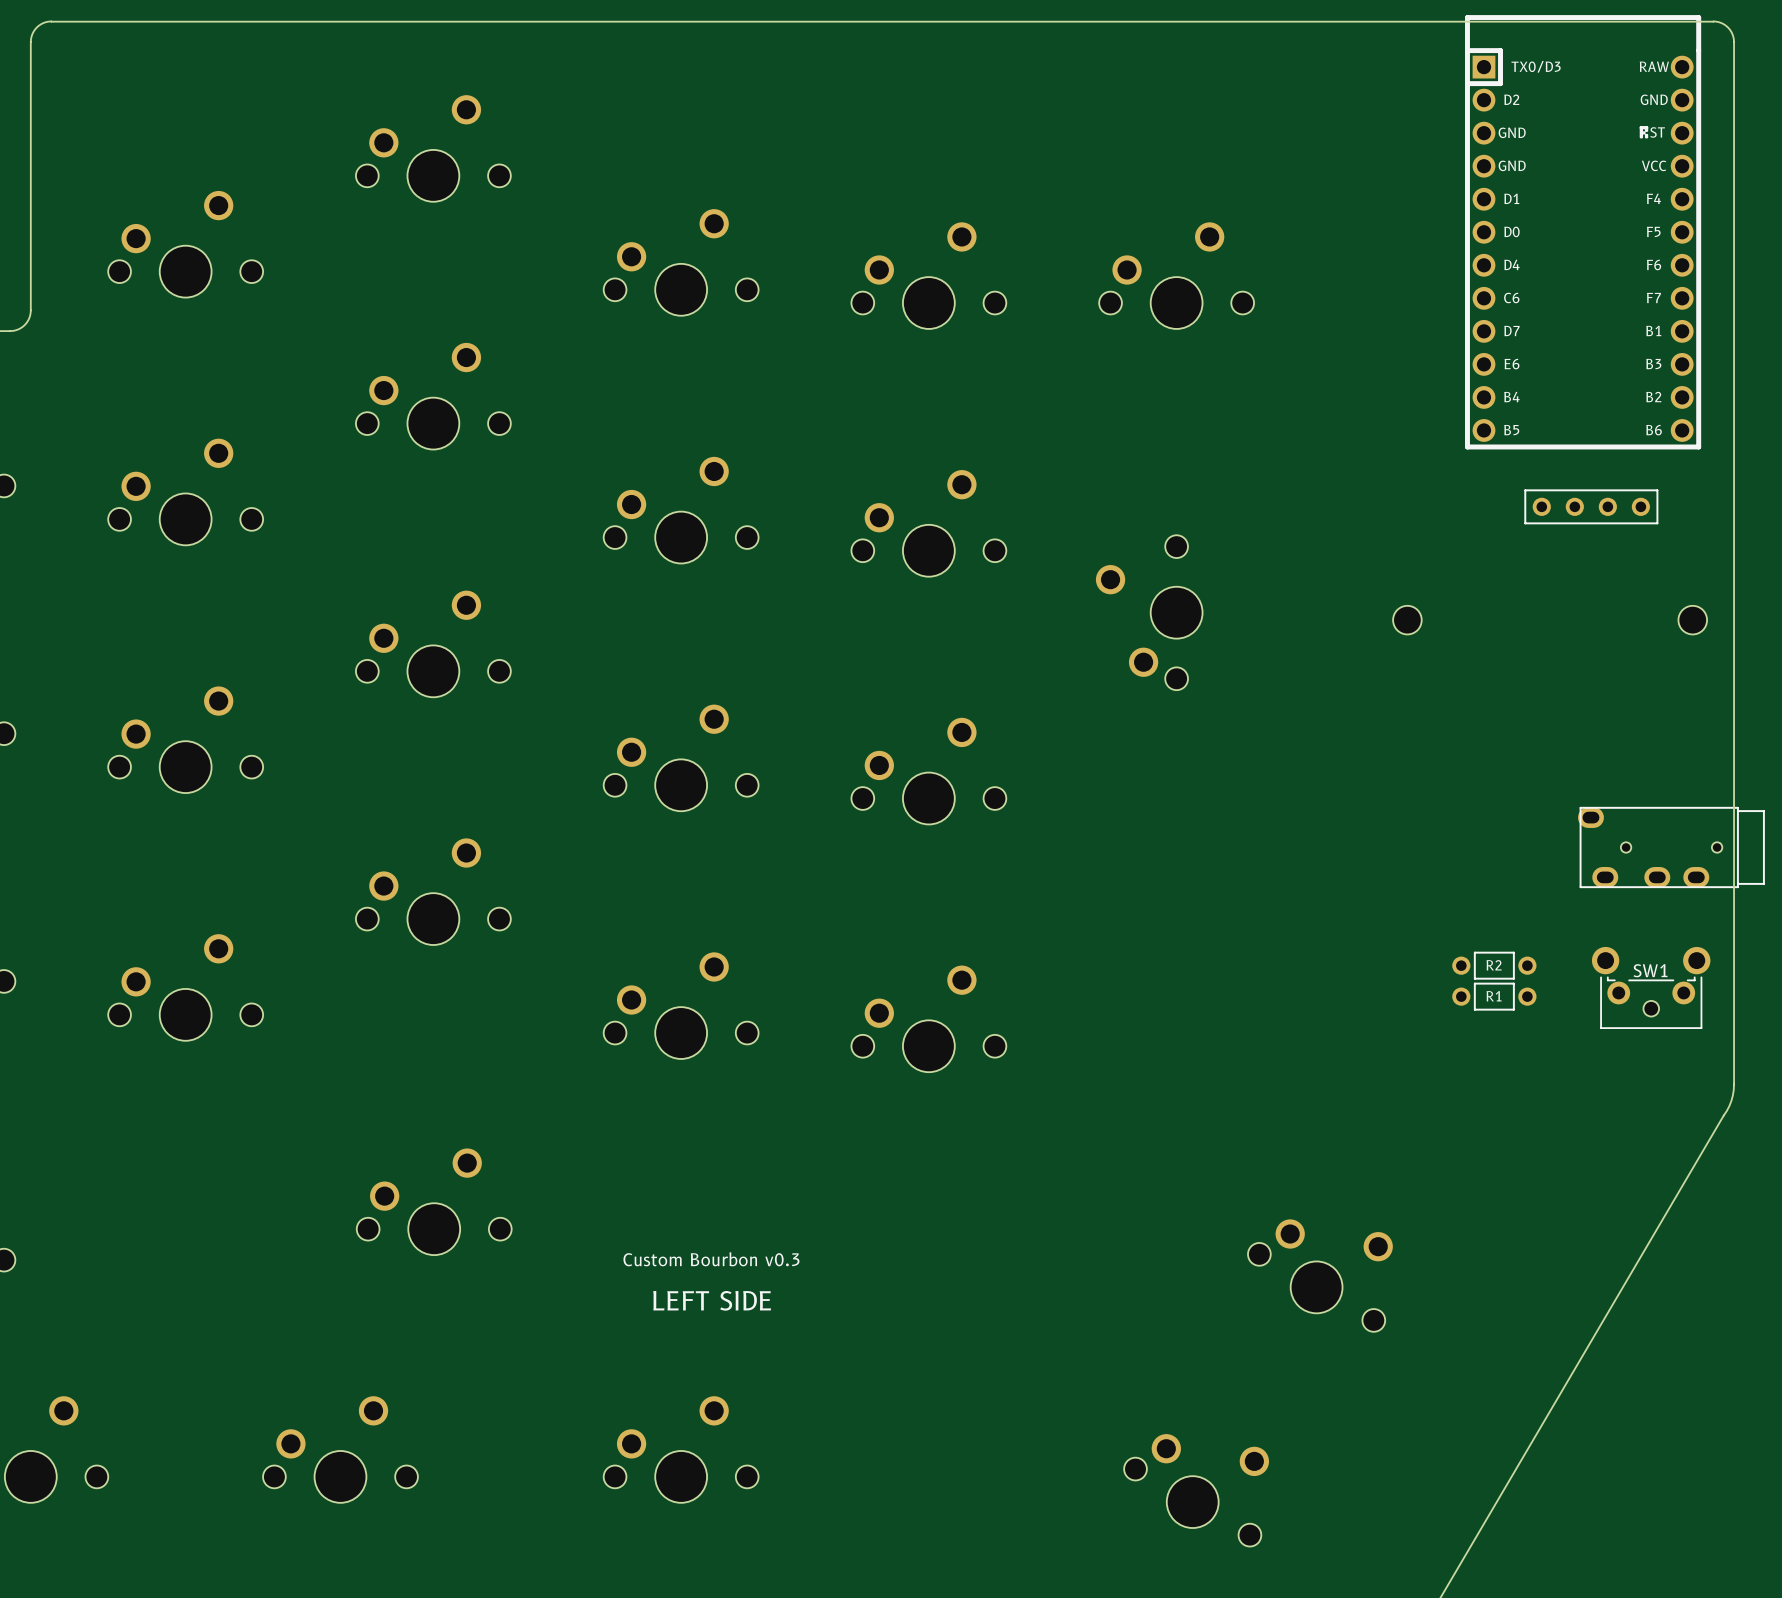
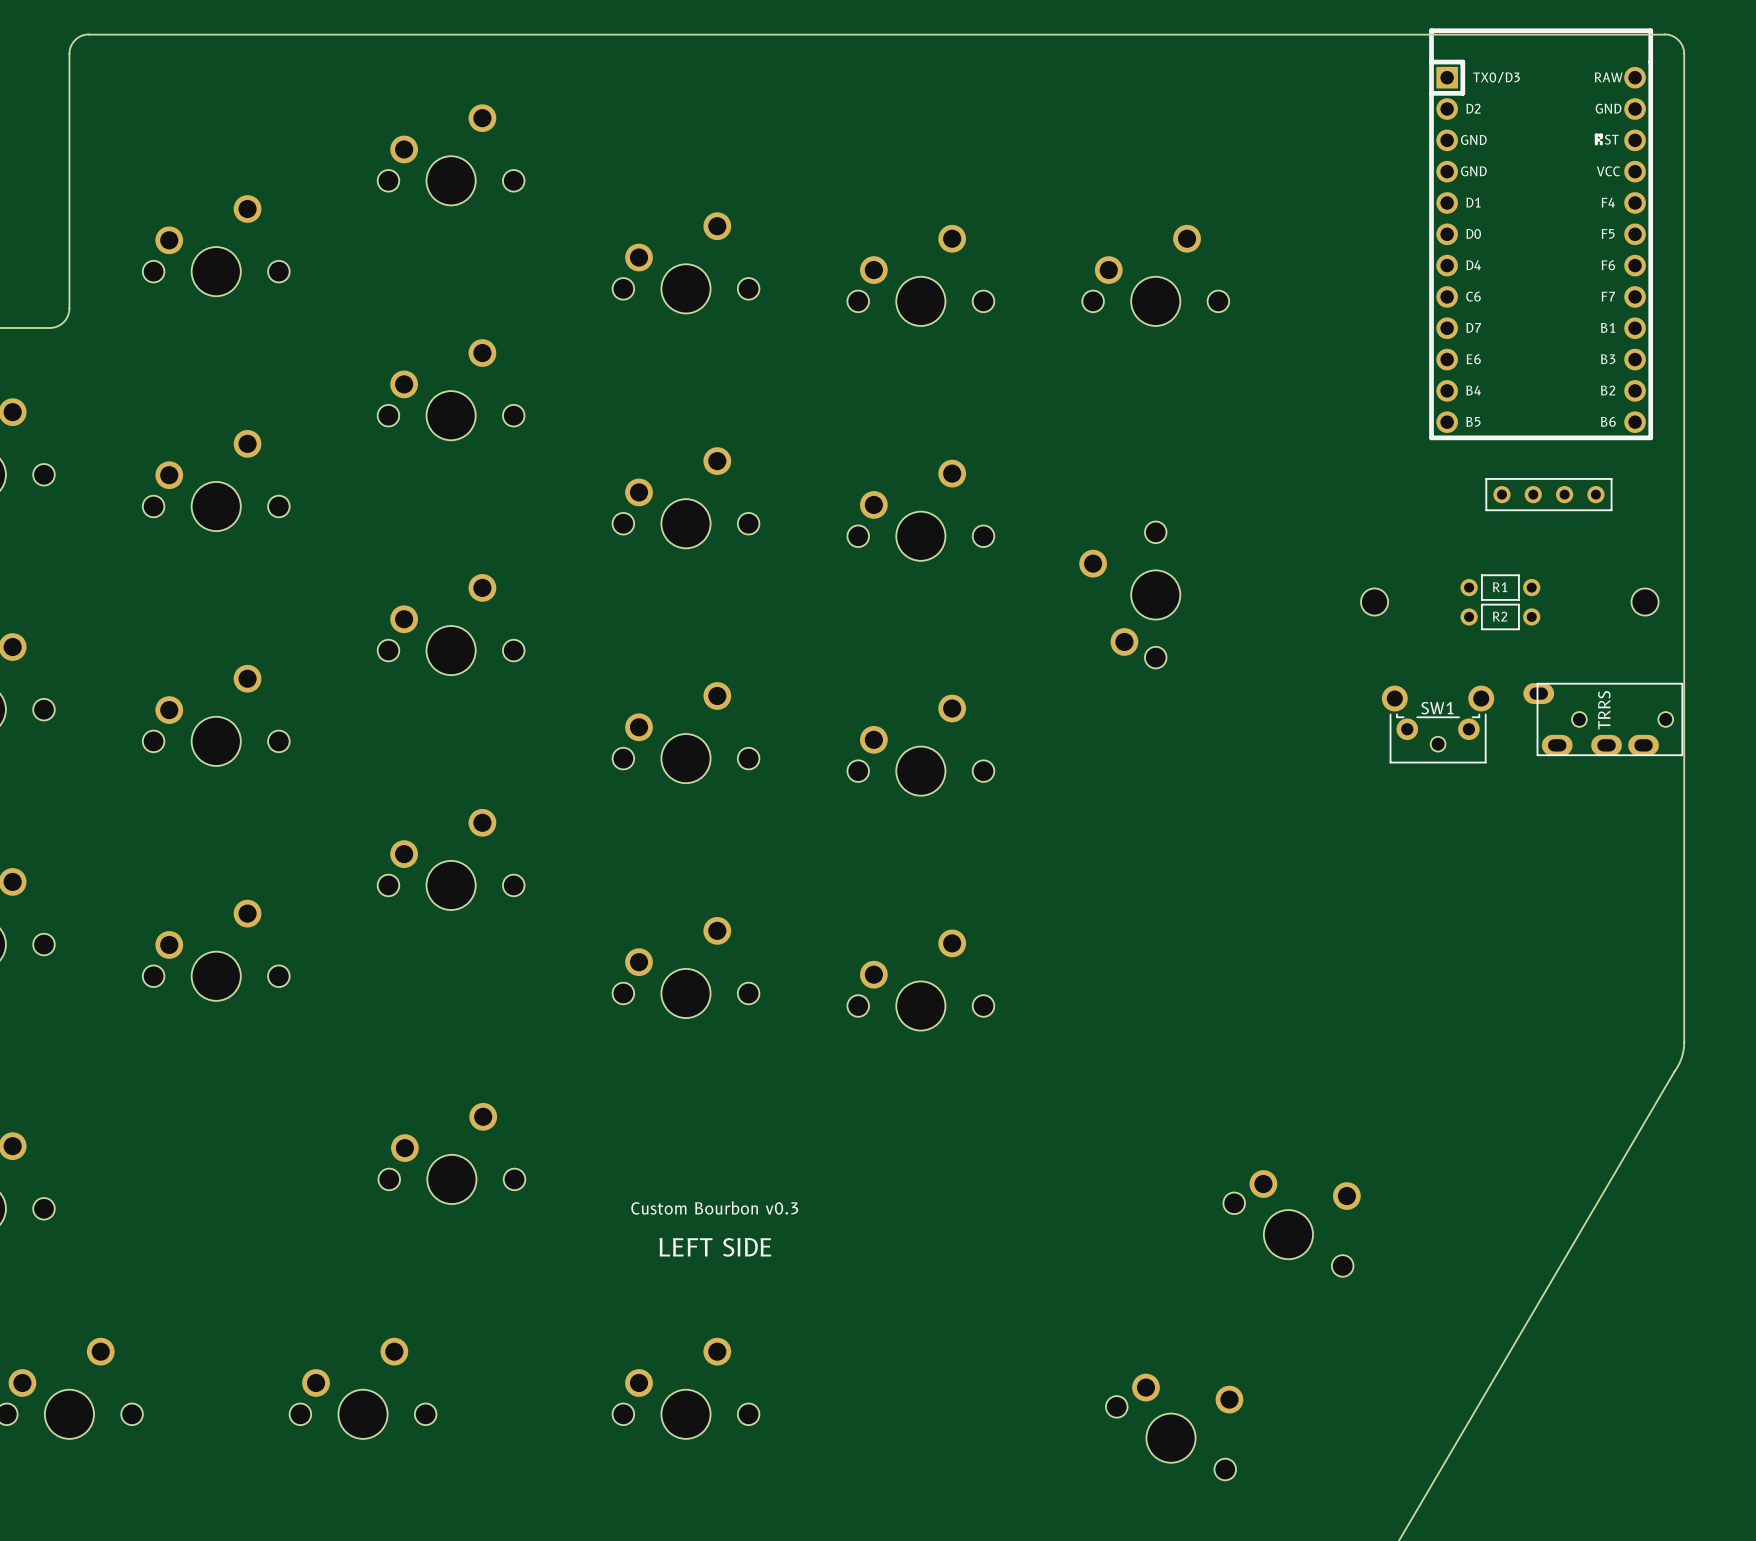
part: none -> (1603, 719)
part: (1671, 847) -> none
R2 position: (1494, 965) -> (1500, 616)
SW1 position: (1651, 987) -> (1438, 724)
R1 position: (1494, 996) -> (1500, 587)

